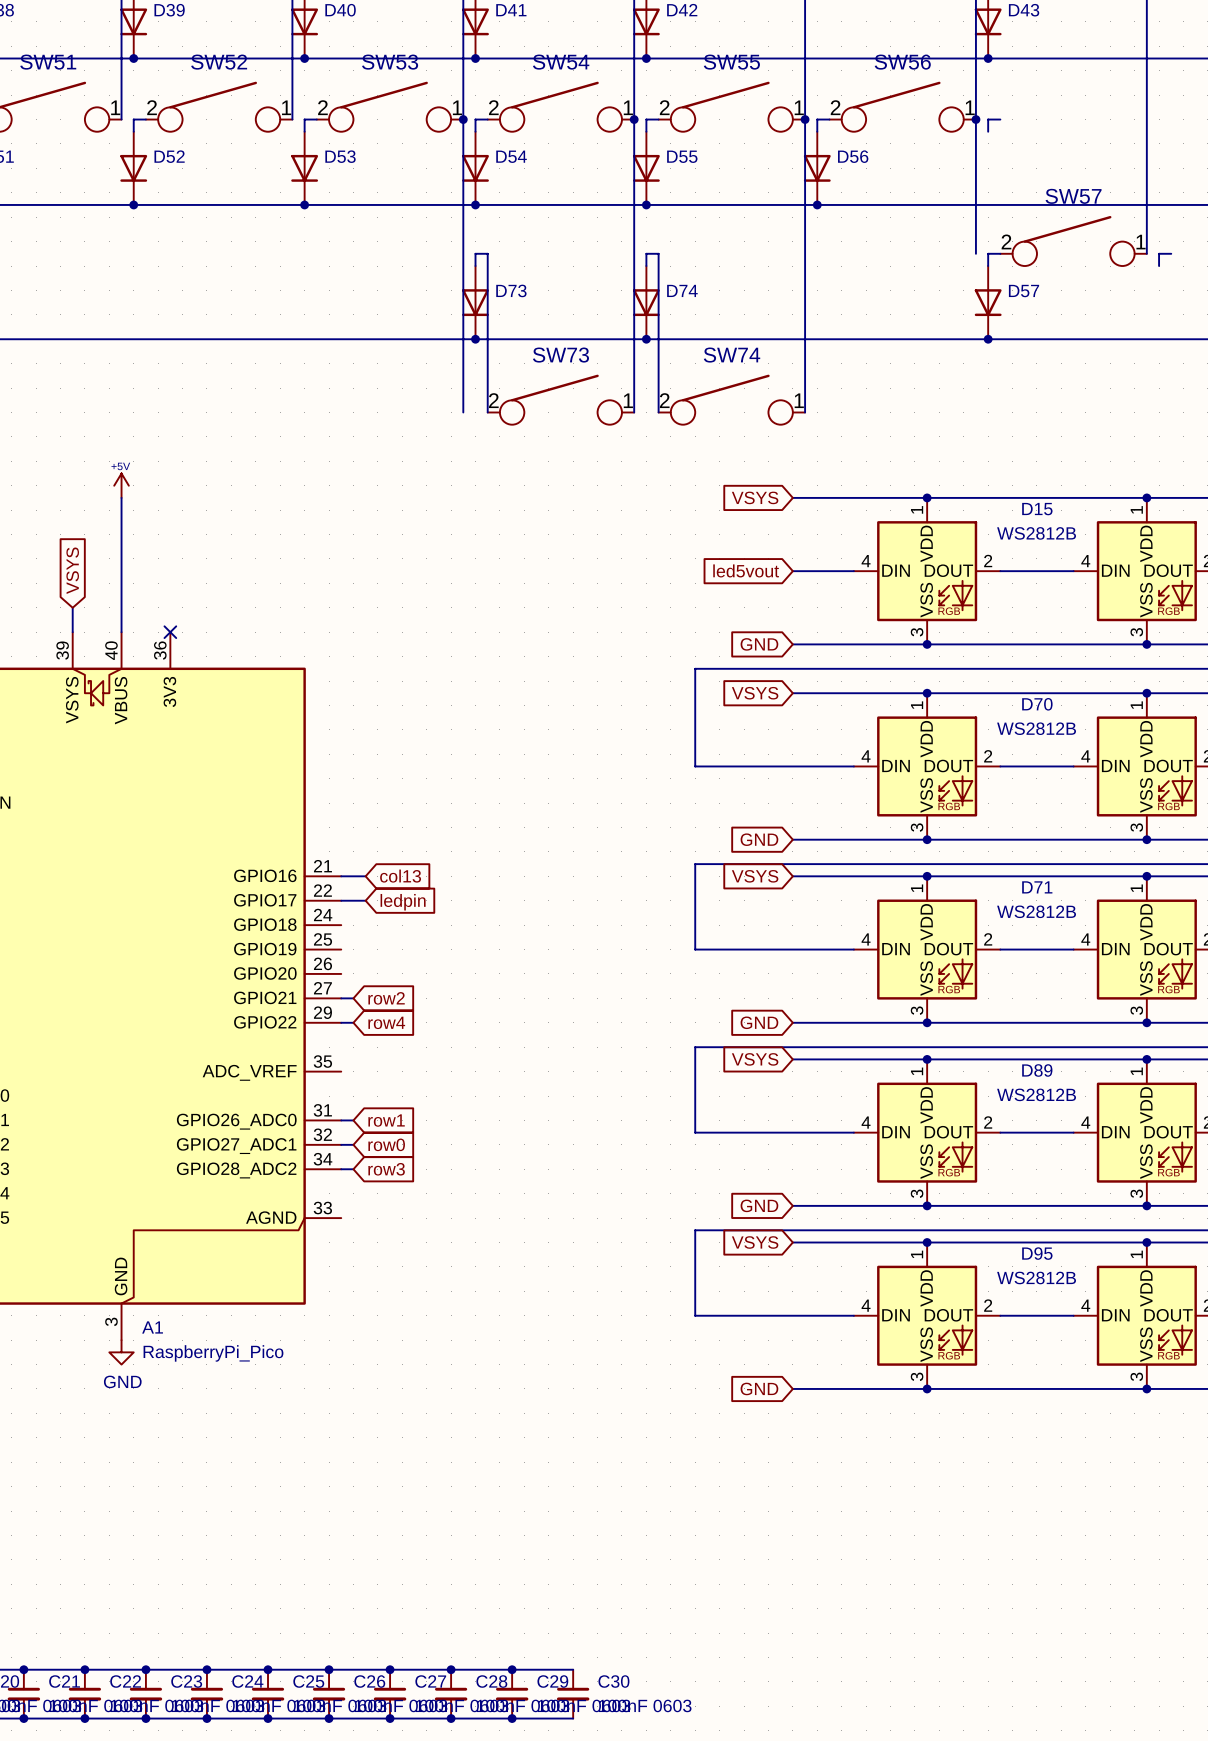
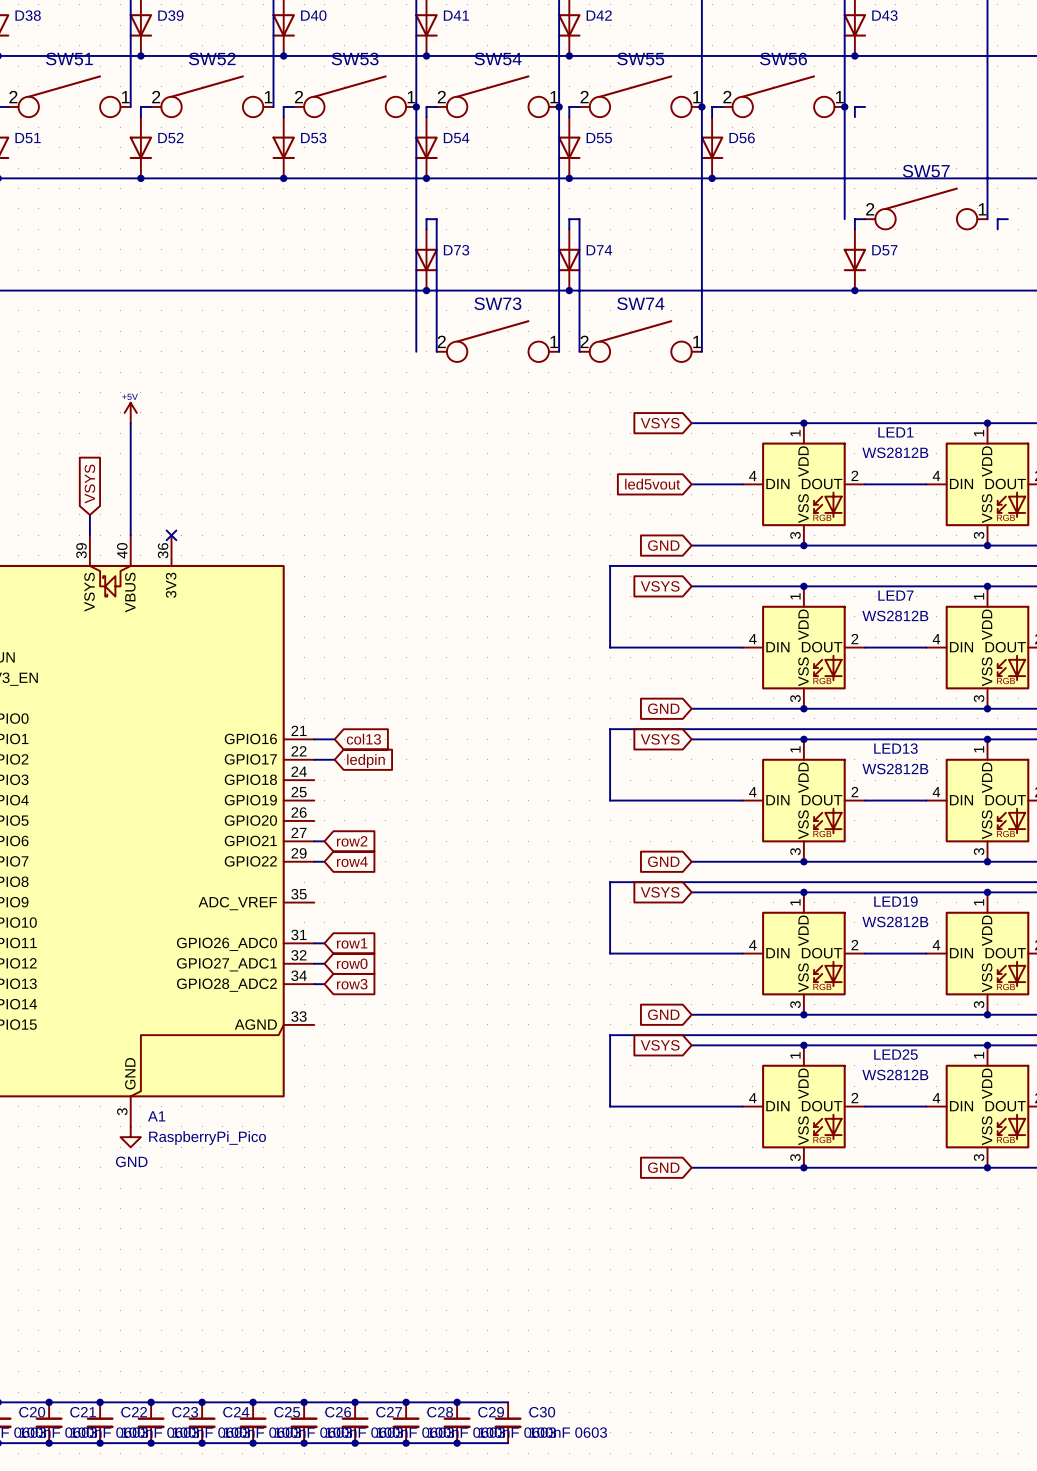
D15 name: D15 (1037, 509) -> LED1 (895, 432)
D70 name: D70 (1037, 704) -> LED7 (895, 595)
D71 name: D71 (1037, 887) -> LED13 (895, 748)
D89 name: D89 (1037, 1070) -> LED19 (895, 901)
D95 name: D95 (1037, 1253) -> LED25 (895, 1054)

